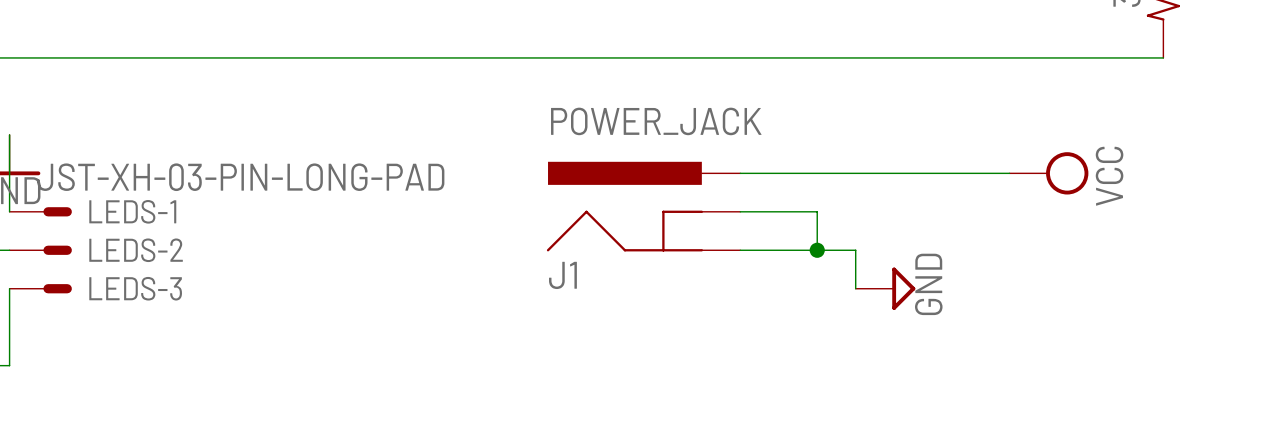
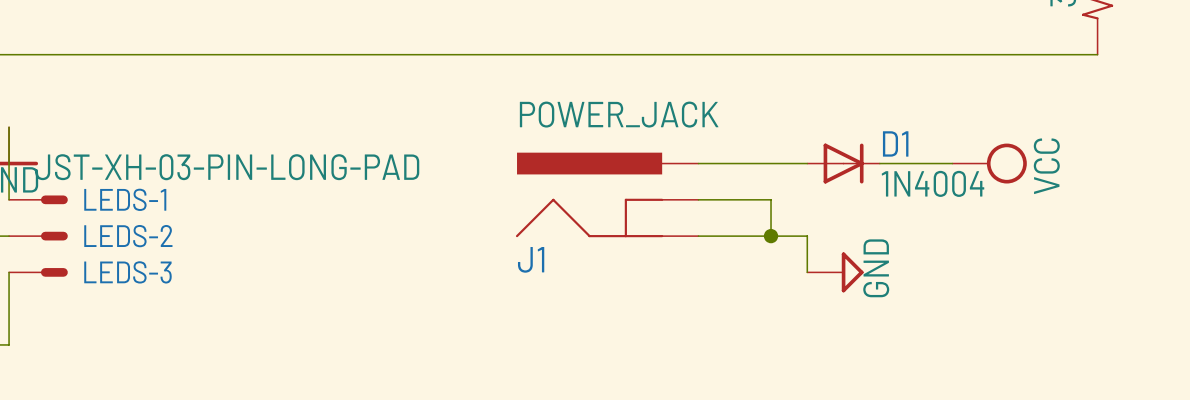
D1: none -> 1N4004 (843, 163)

